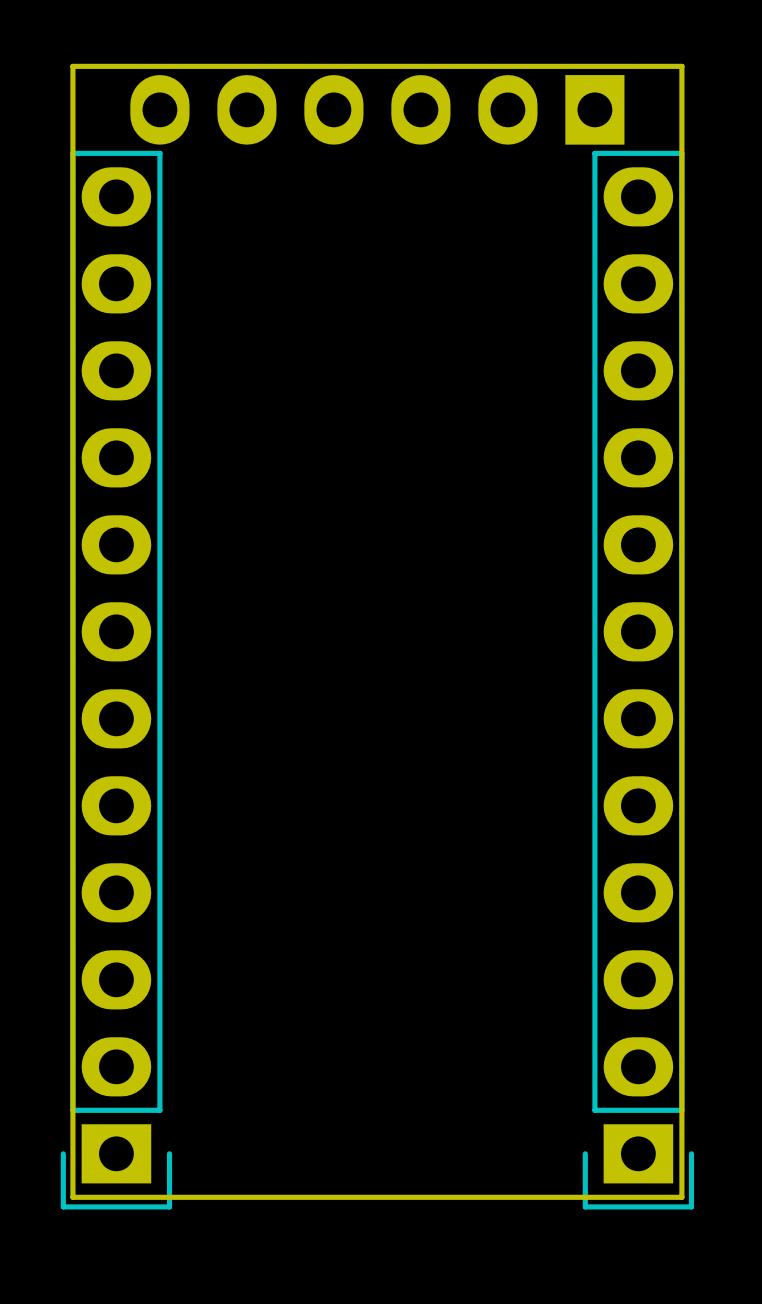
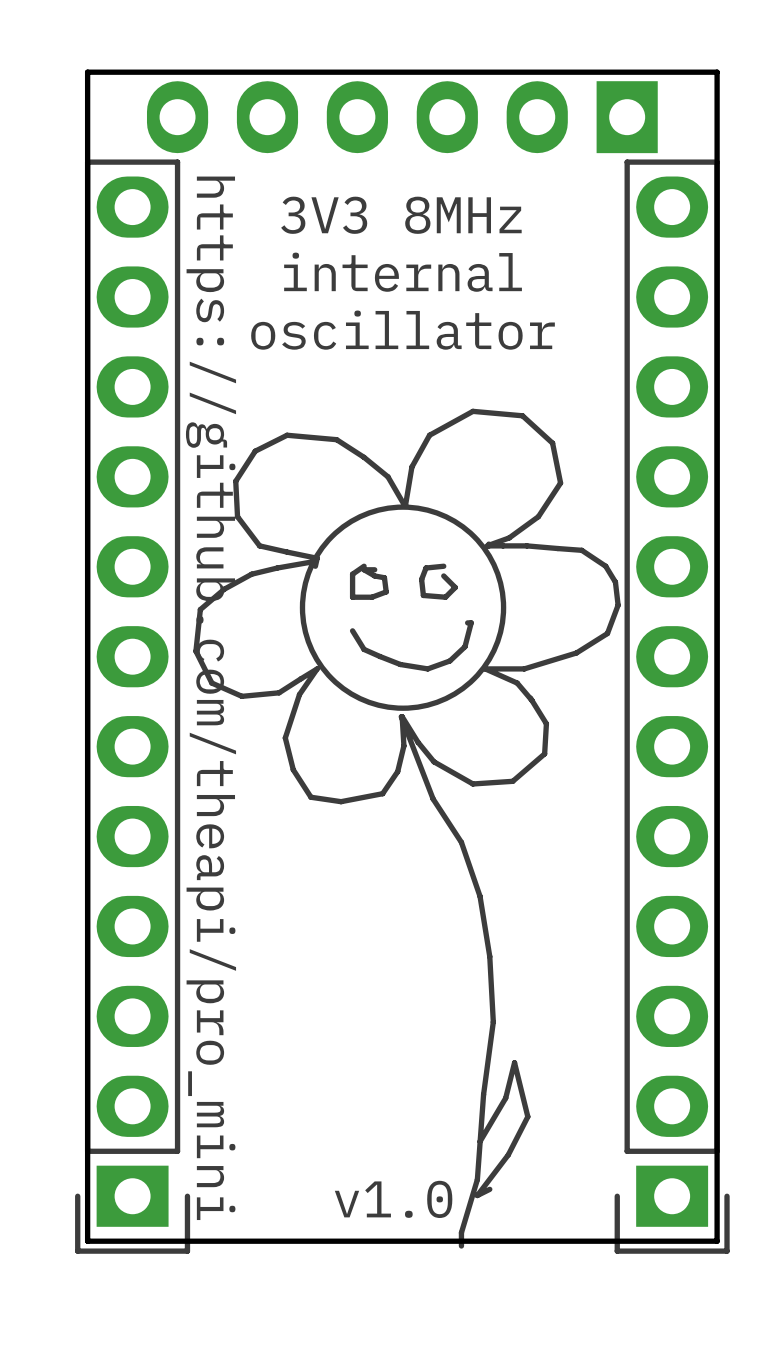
text: none -> 3V3 8MHz (401, 215)
text: none -> internal (403, 272)
text: none -> oscillator (403, 330)
drawing: none -> [193, 408, 621, 1249]
text: none -> https://github.com/theapi/pro_mini (211, 698)
text: none -> v1.0 (393, 1199)

